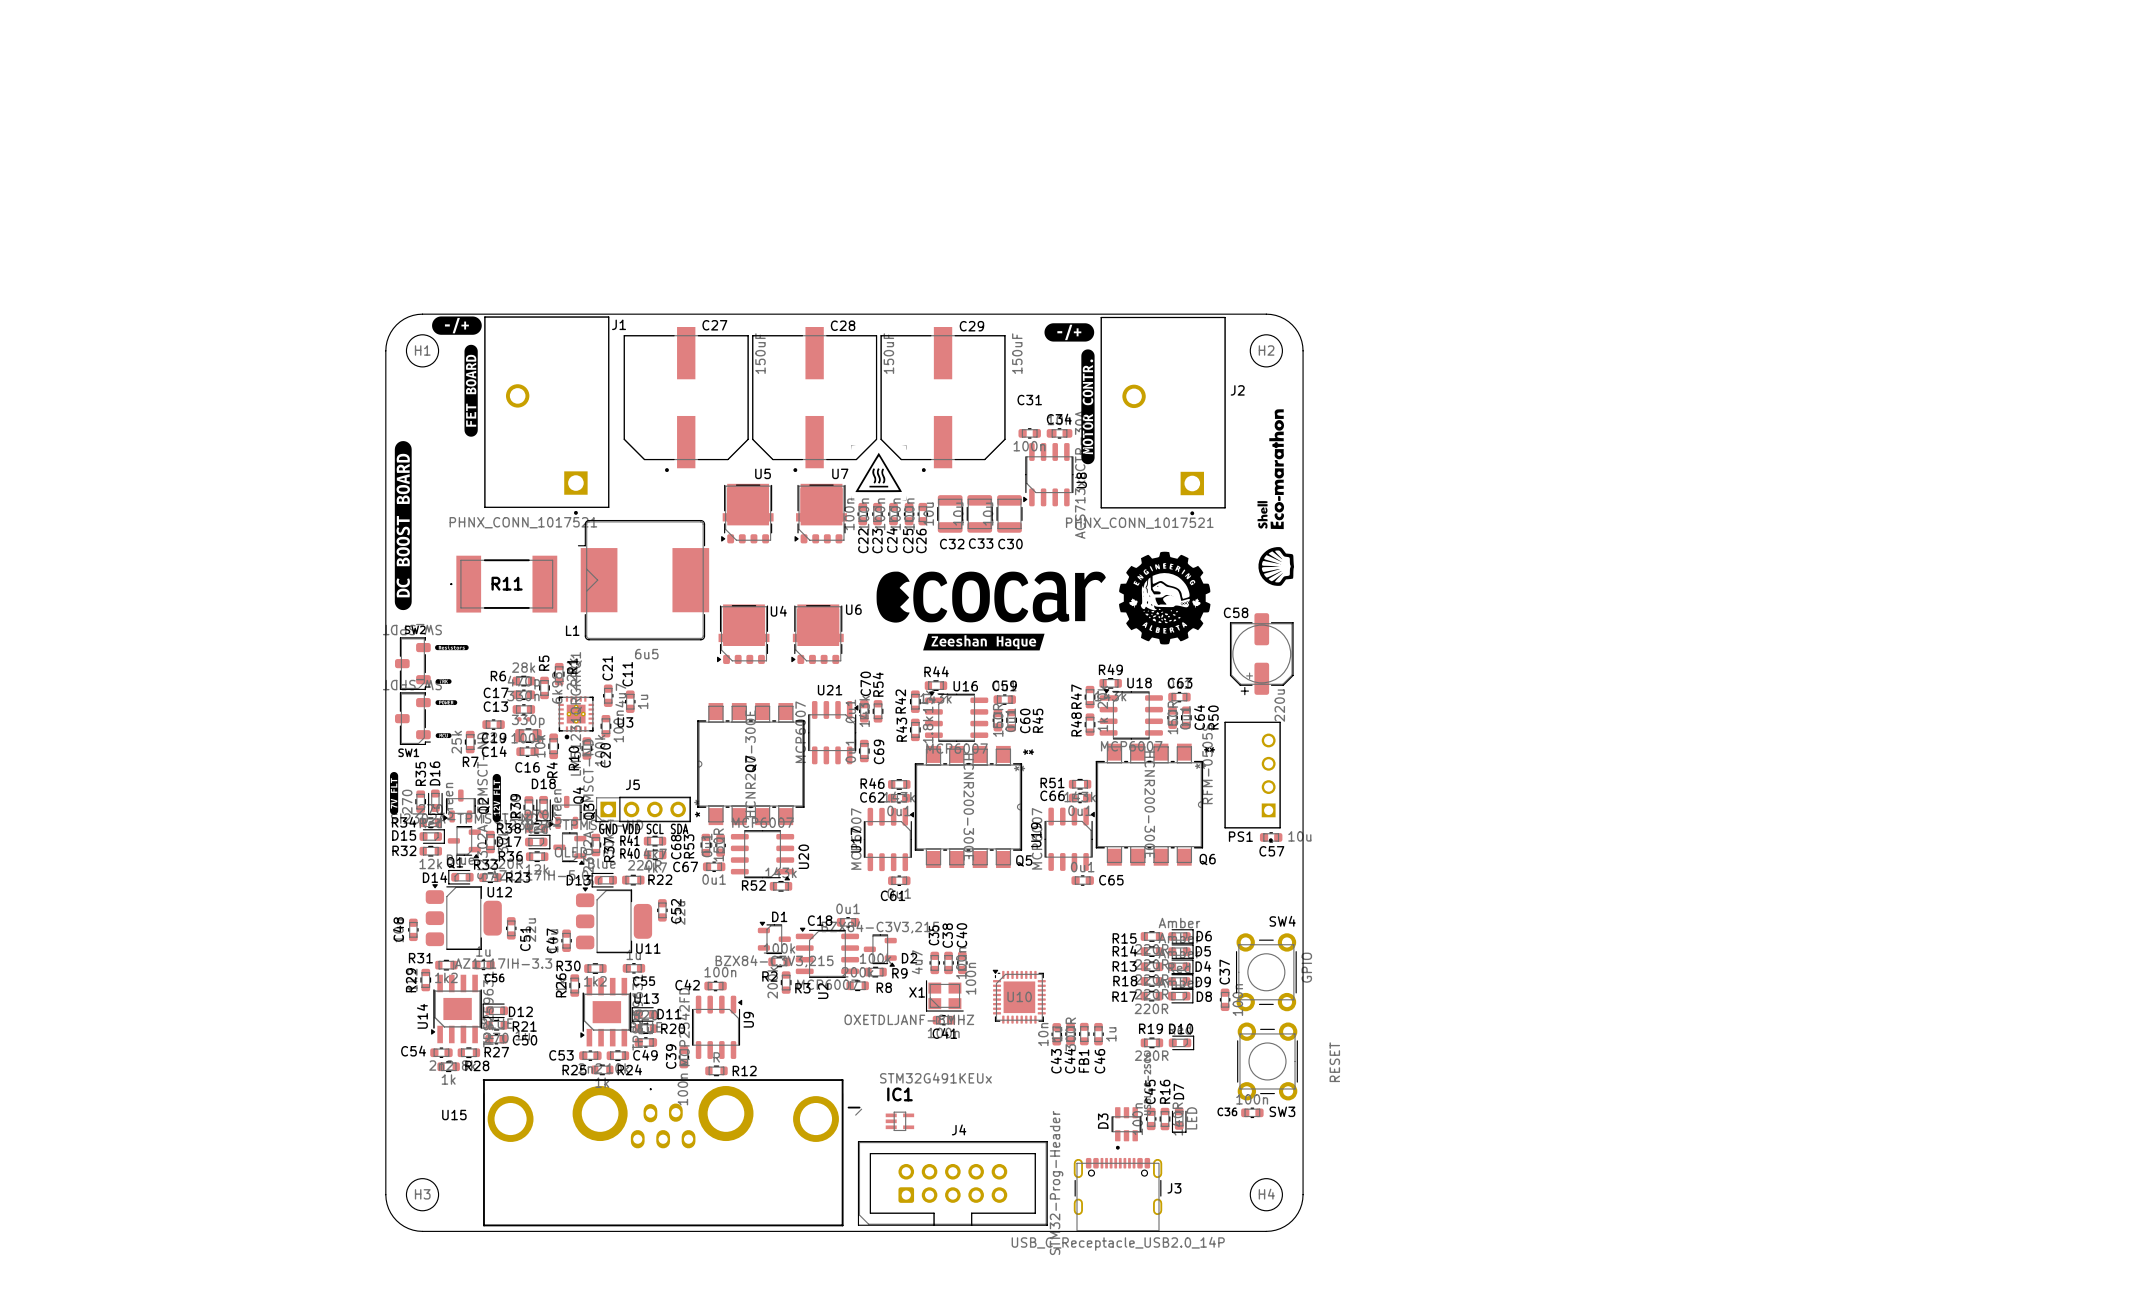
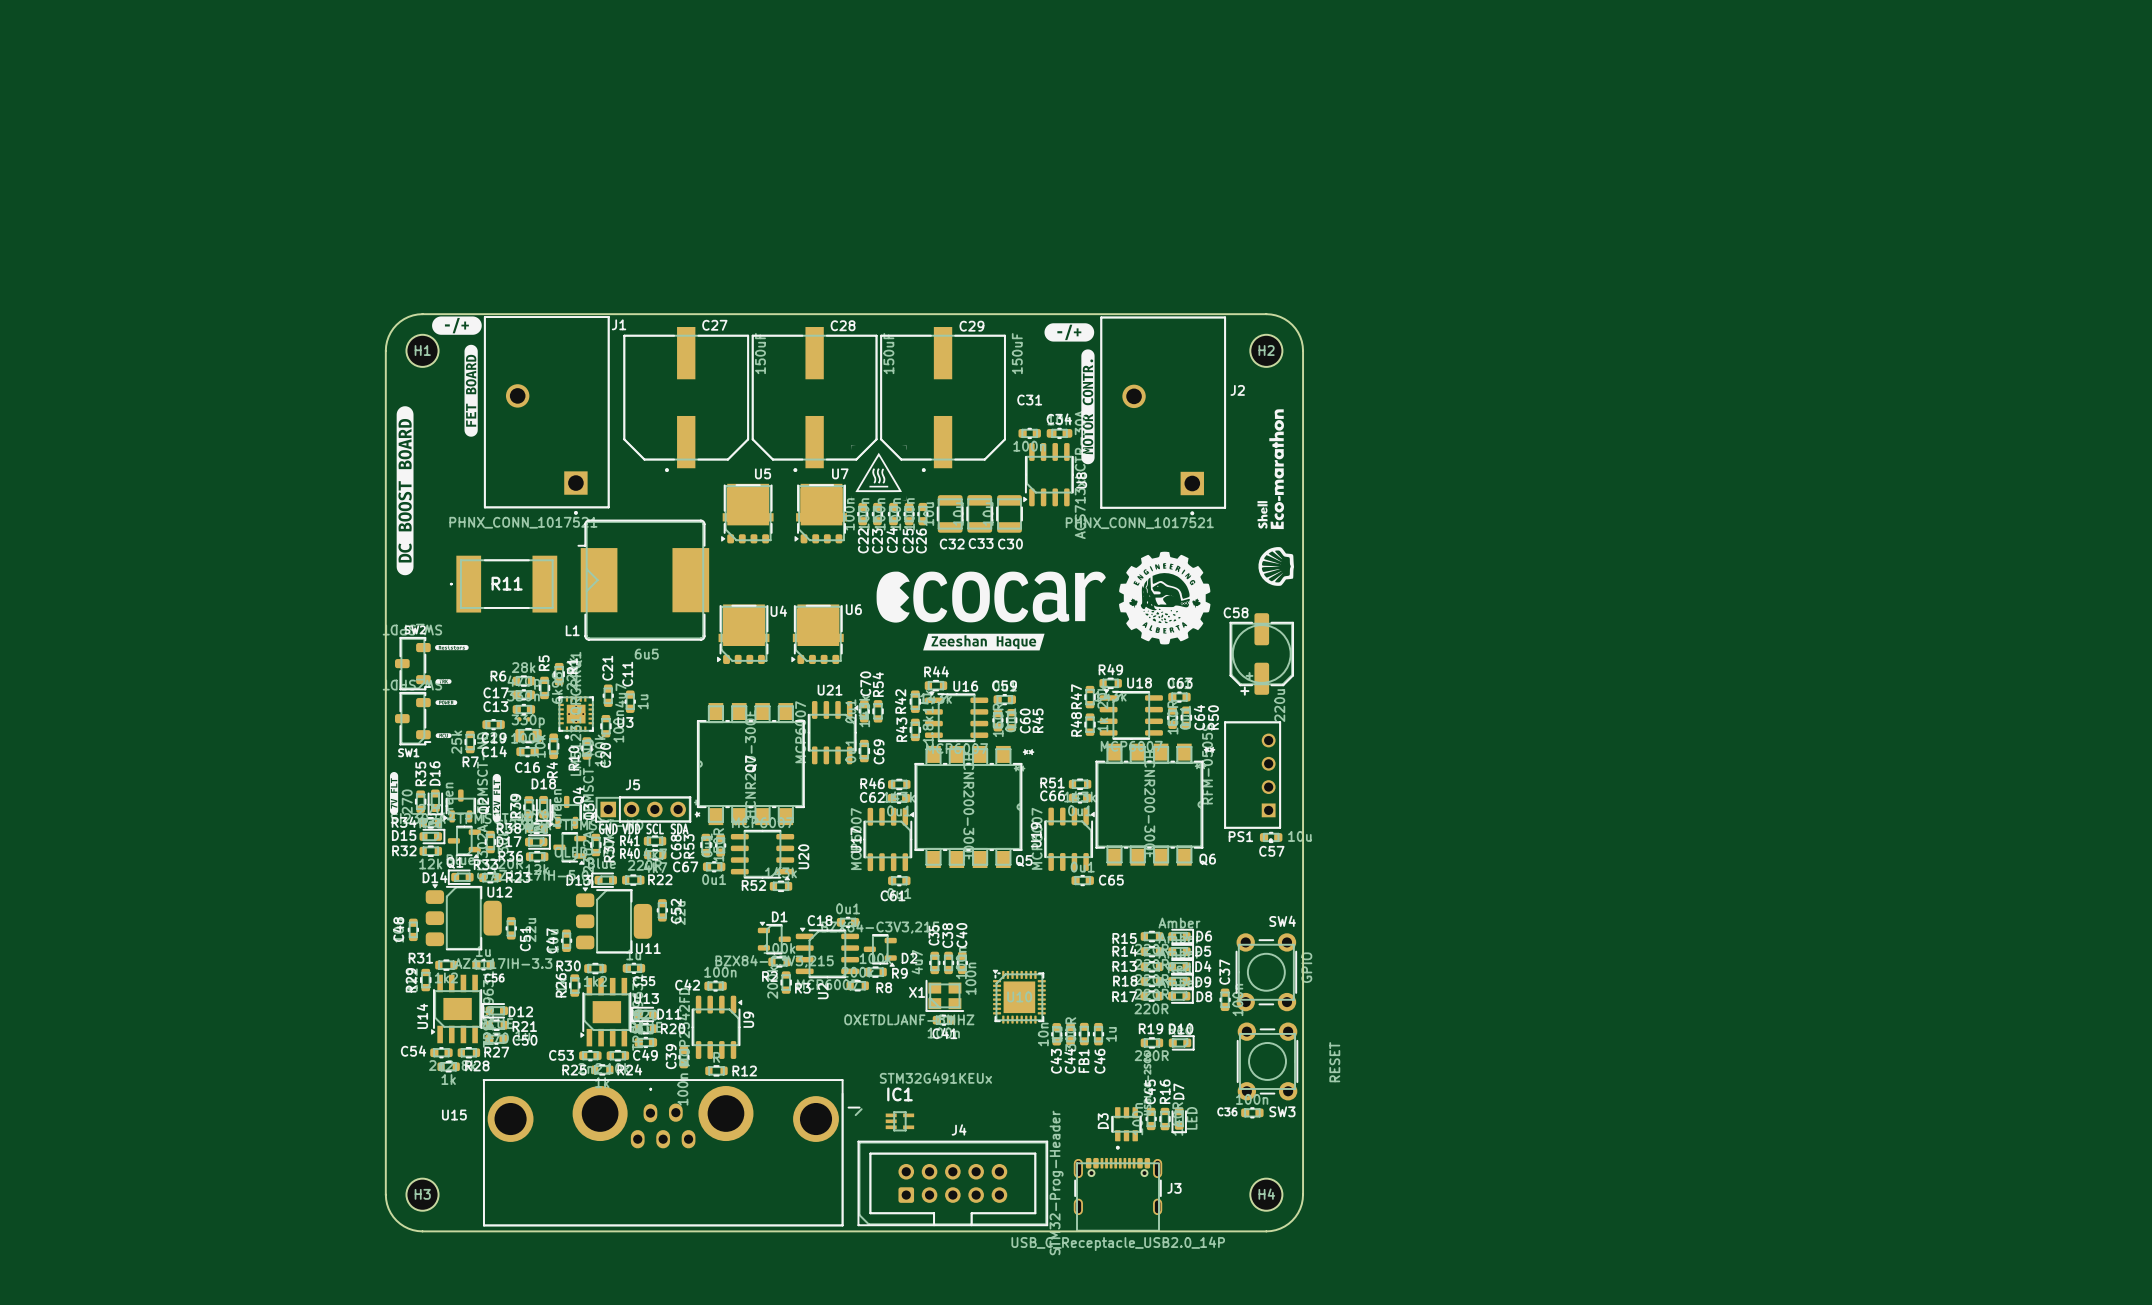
drawing position: (403, 525) -> (405, 490)

